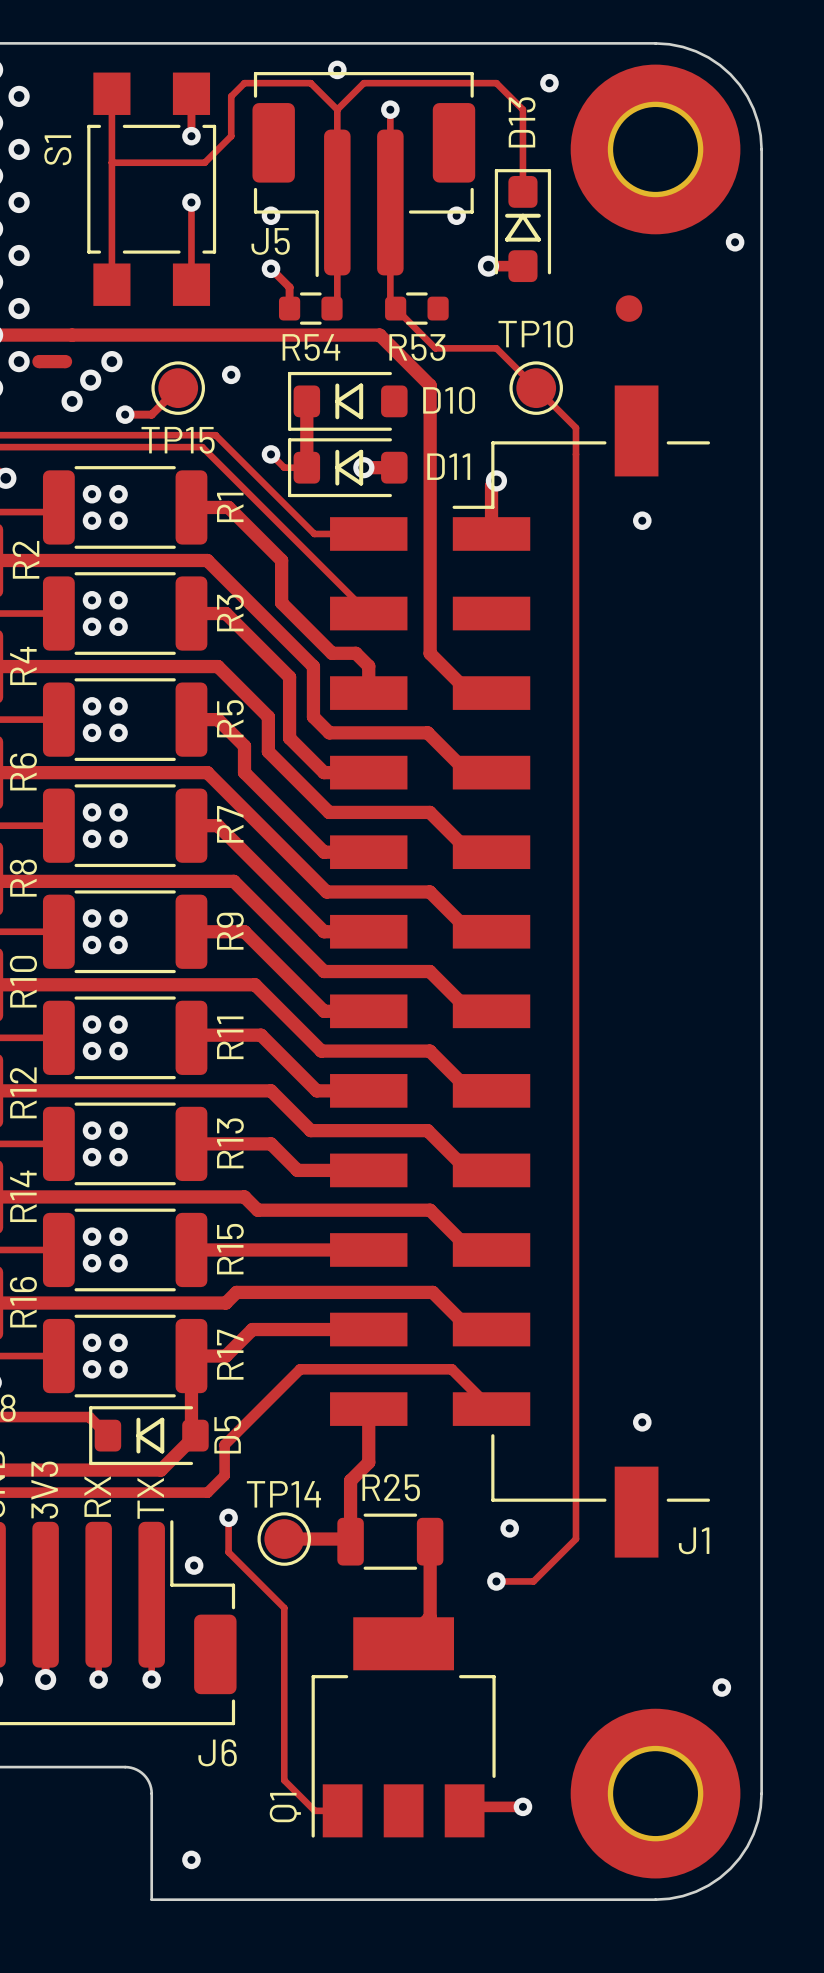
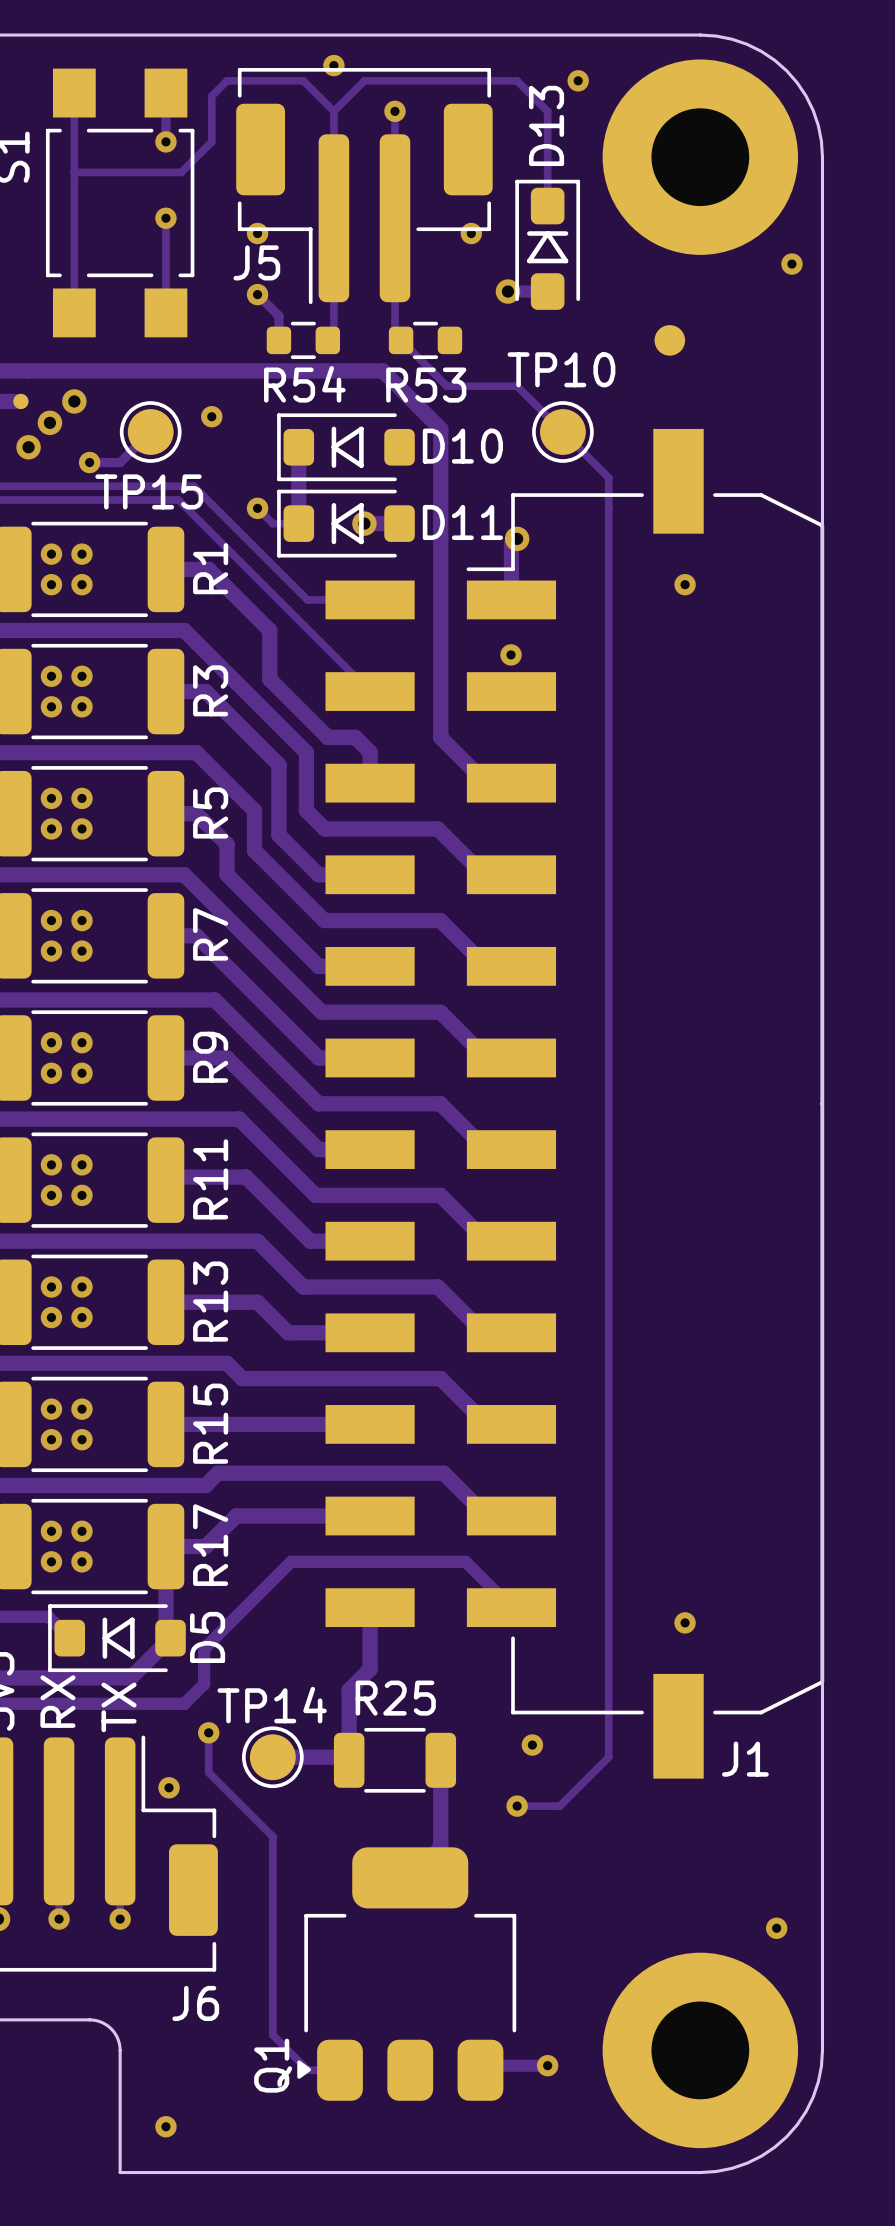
J1 footprint: [330, 385, 711, 1558] -> [325, 428, 825, 1779]
via: none -> (511, 654)
Q1 footprint: [311, 1617, 496, 1838] -> [297, 1847, 517, 2101]

